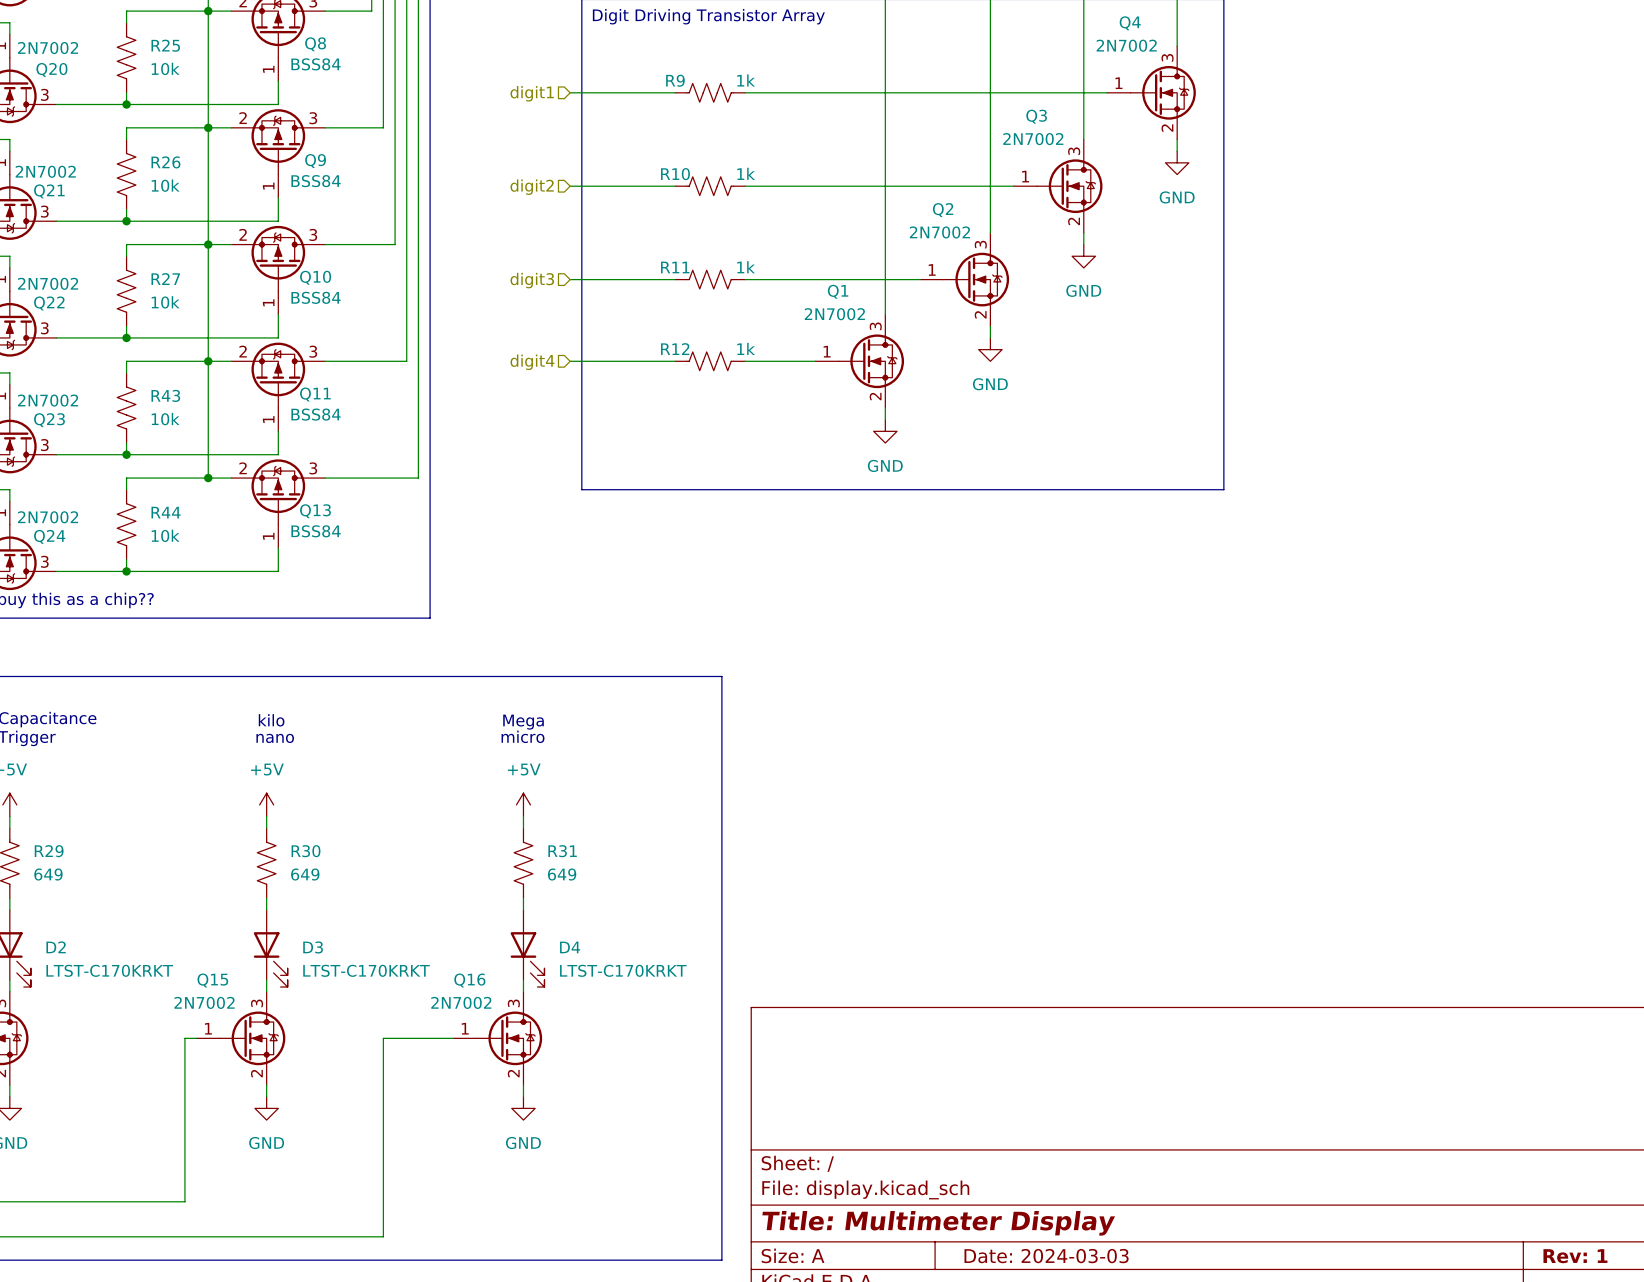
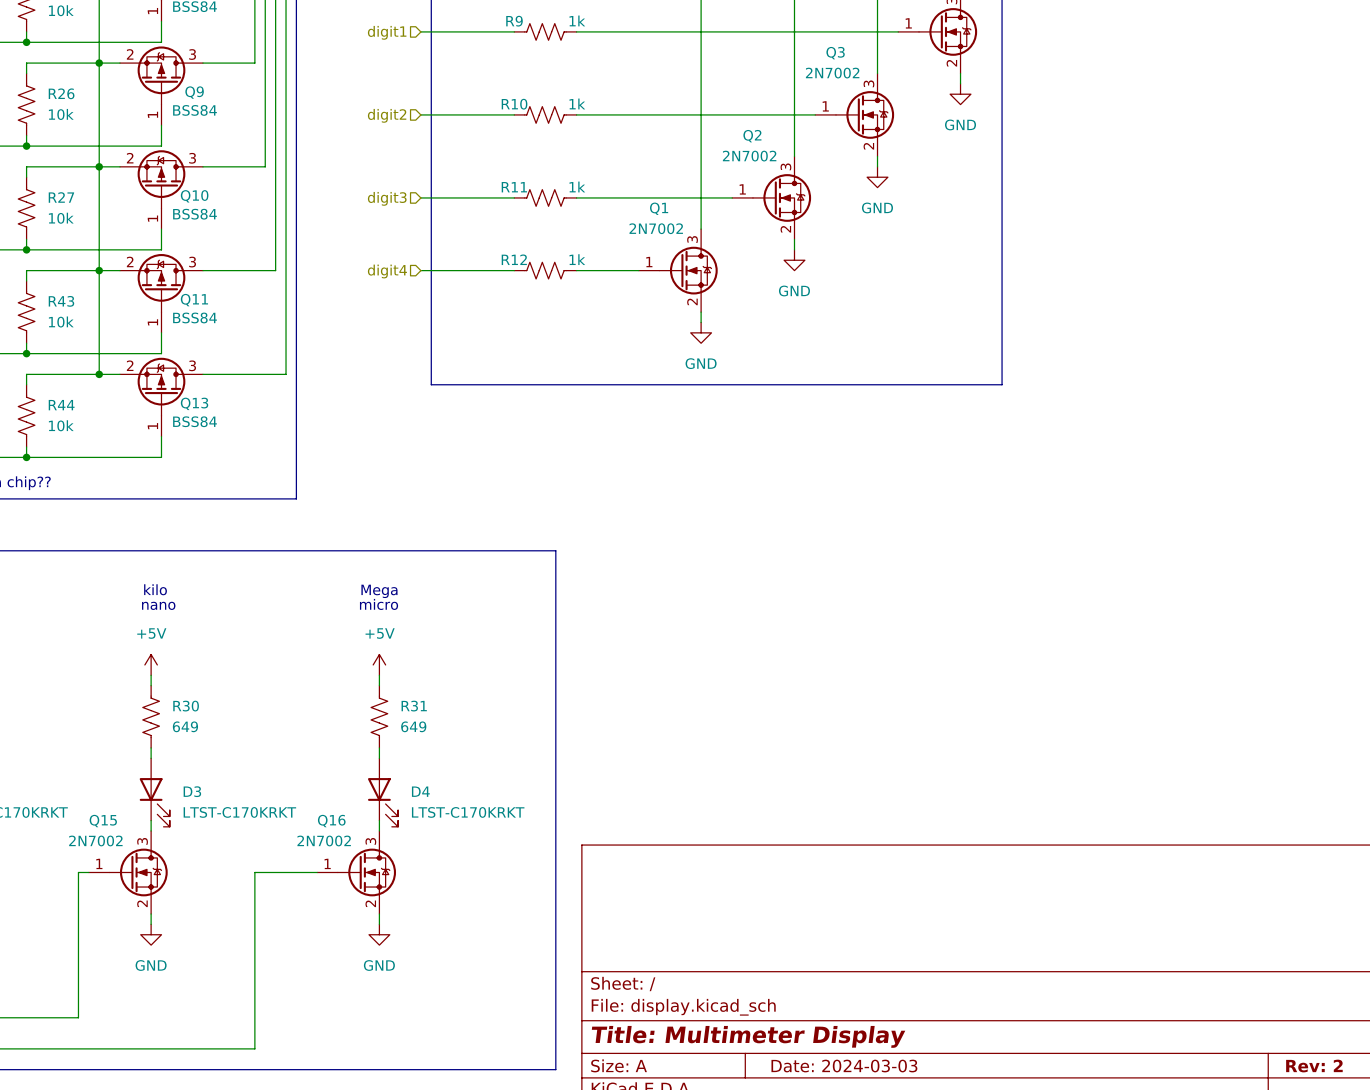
title block: Rev: 1 (1575, 1256) -> Rev: 2 (1314, 1066)

